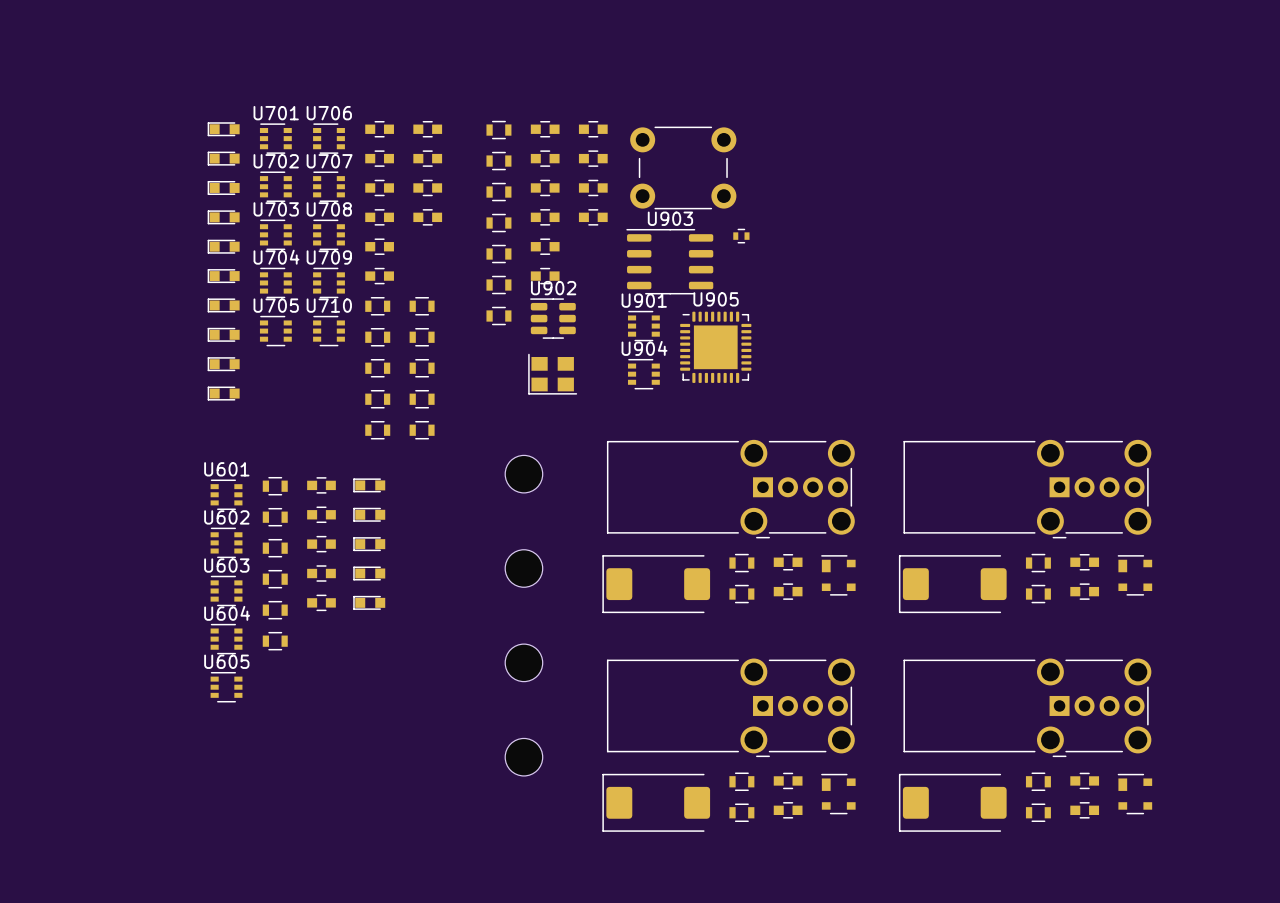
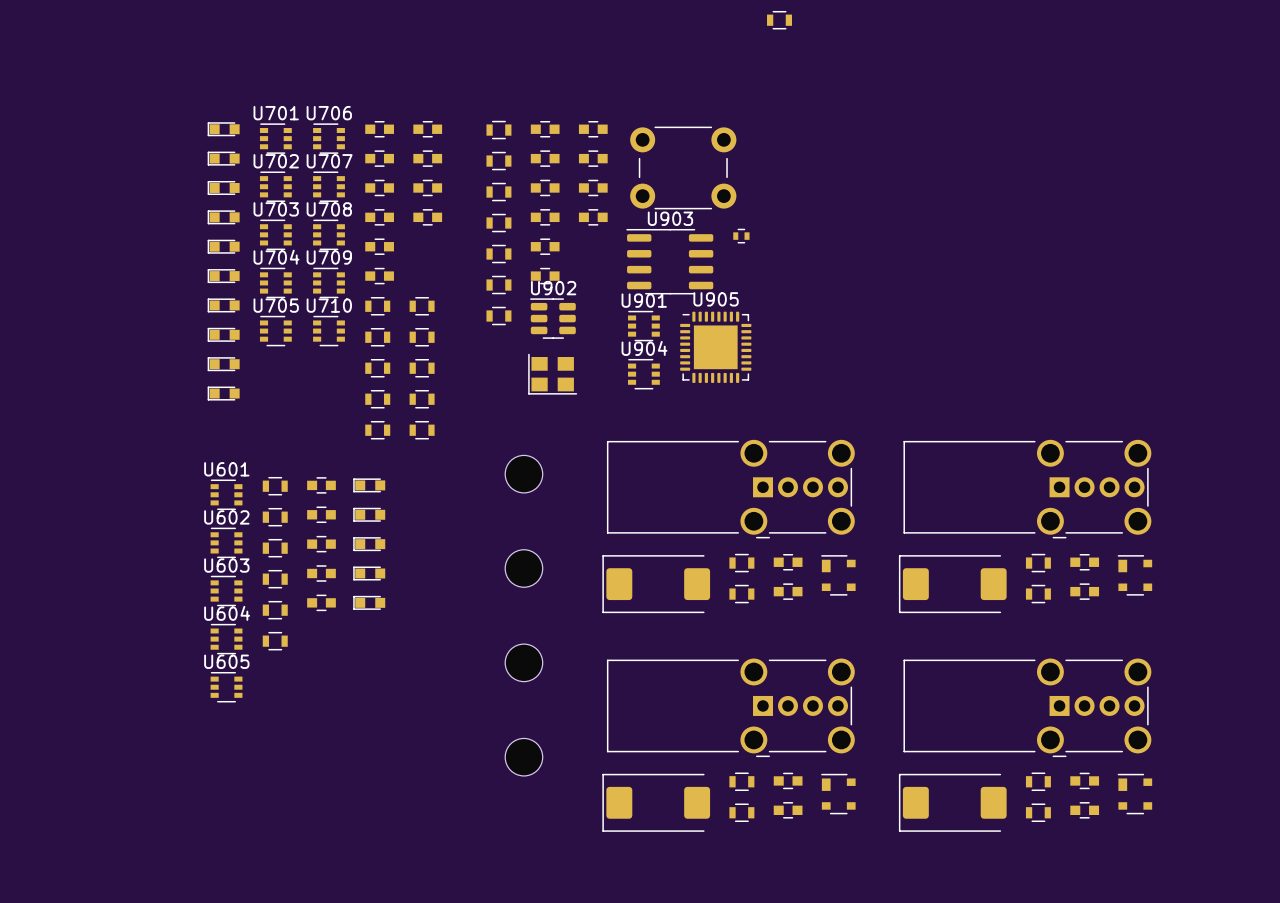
part: none -> (779, 20)

